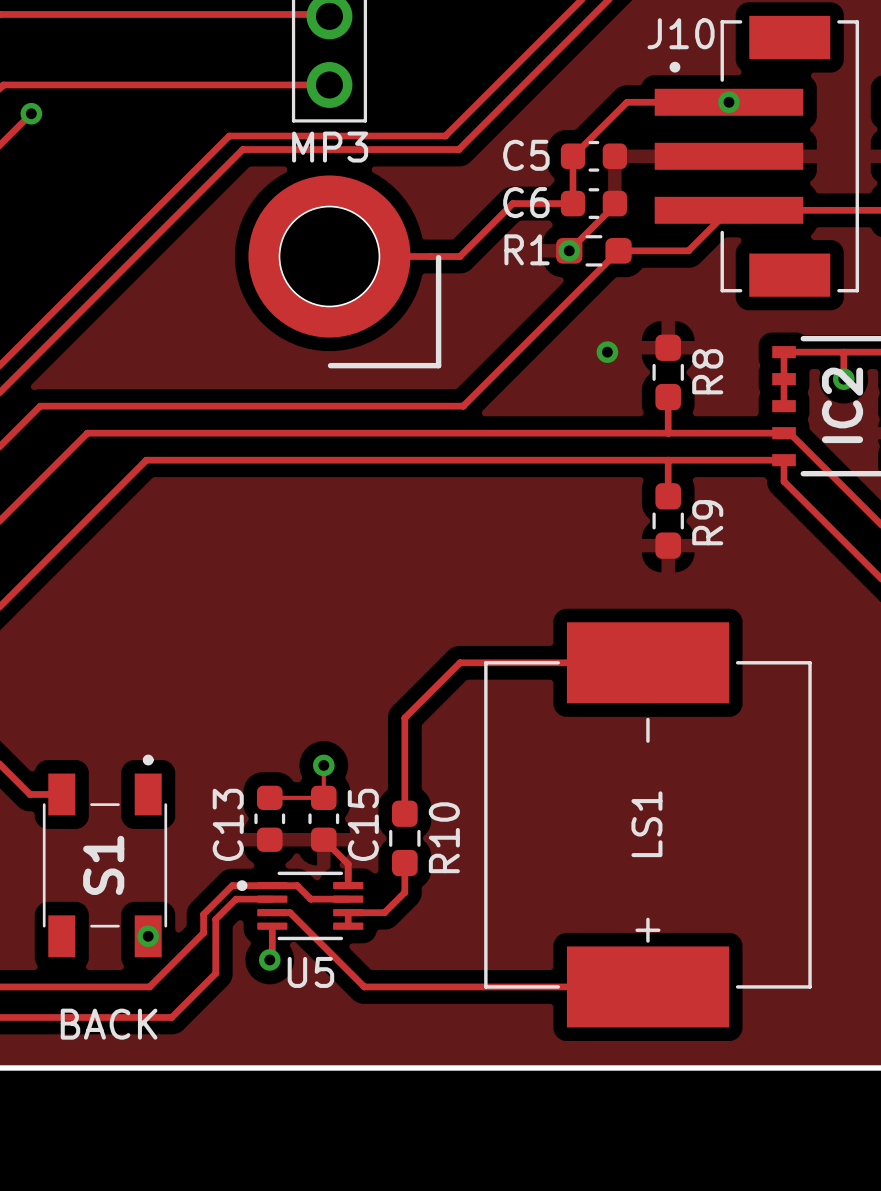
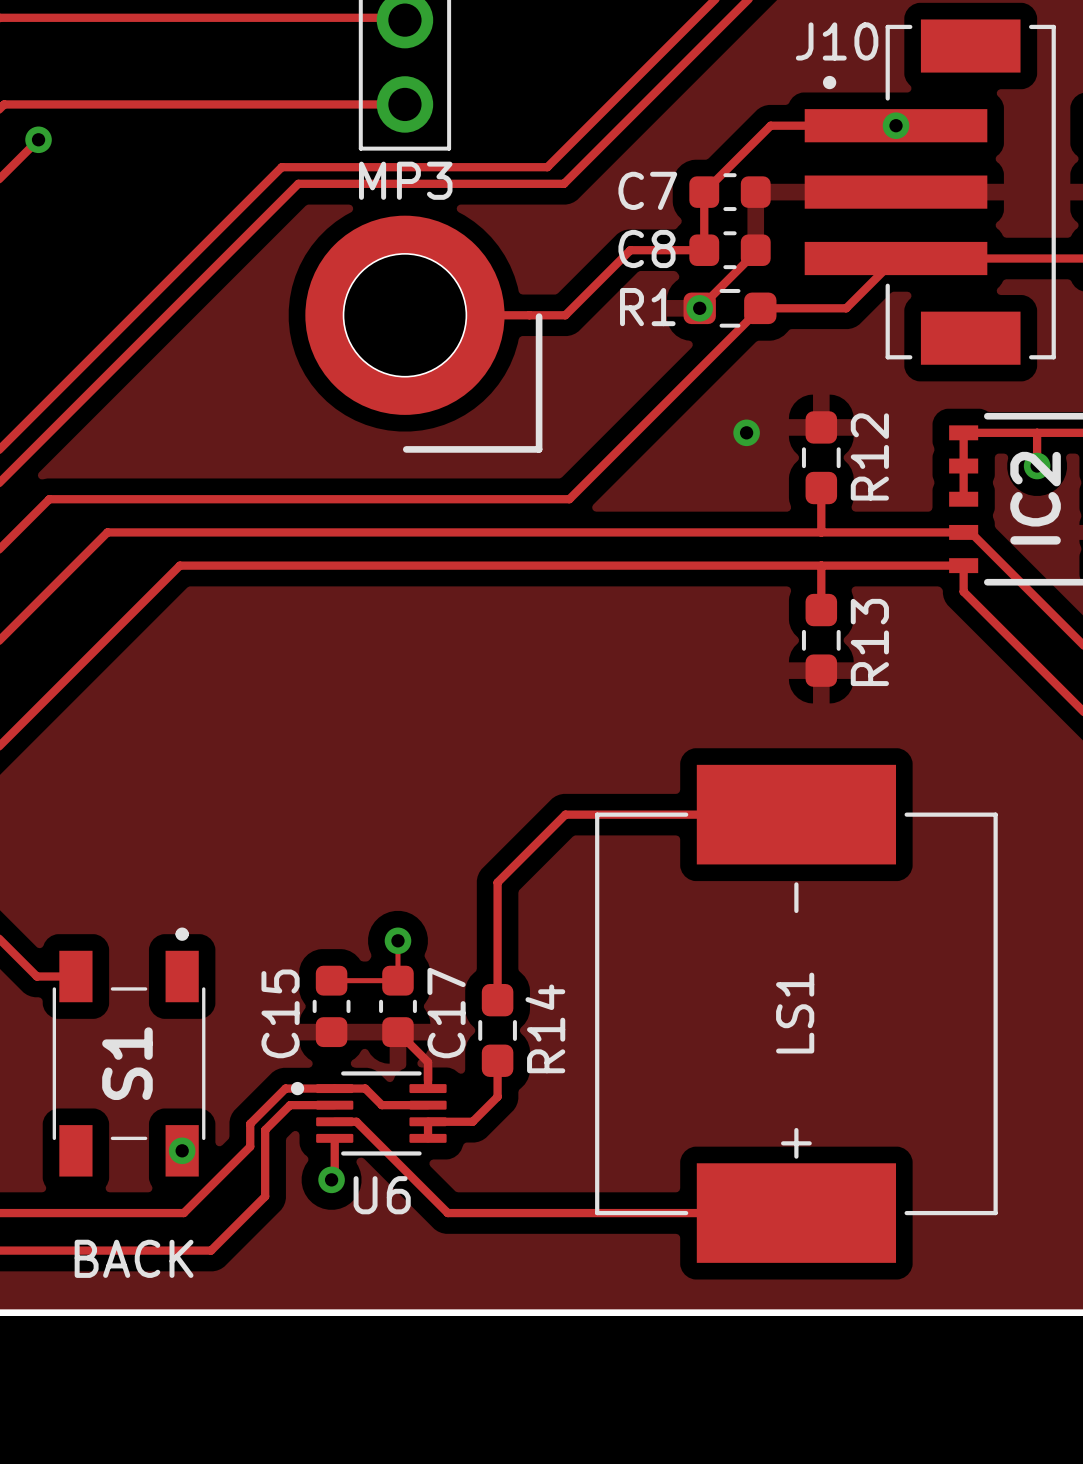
C5 name: C5 (526, 155) -> C7 (647, 190)
C6 name: C6 (526, 202) -> C8 (647, 248)
R8 name: R8 (707, 371) -> R12 (869, 456)
R9 name: R9 (707, 522) -> R13 (869, 642)
C13 name: C13 (228, 824) -> C15 (280, 1013)
C15 name: C15 (363, 824) -> C17 (446, 1013)
R10 name: R10 (444, 837) -> R14 (545, 1028)
U5 name: U5 (310, 972) -> U6 (382, 1195)

